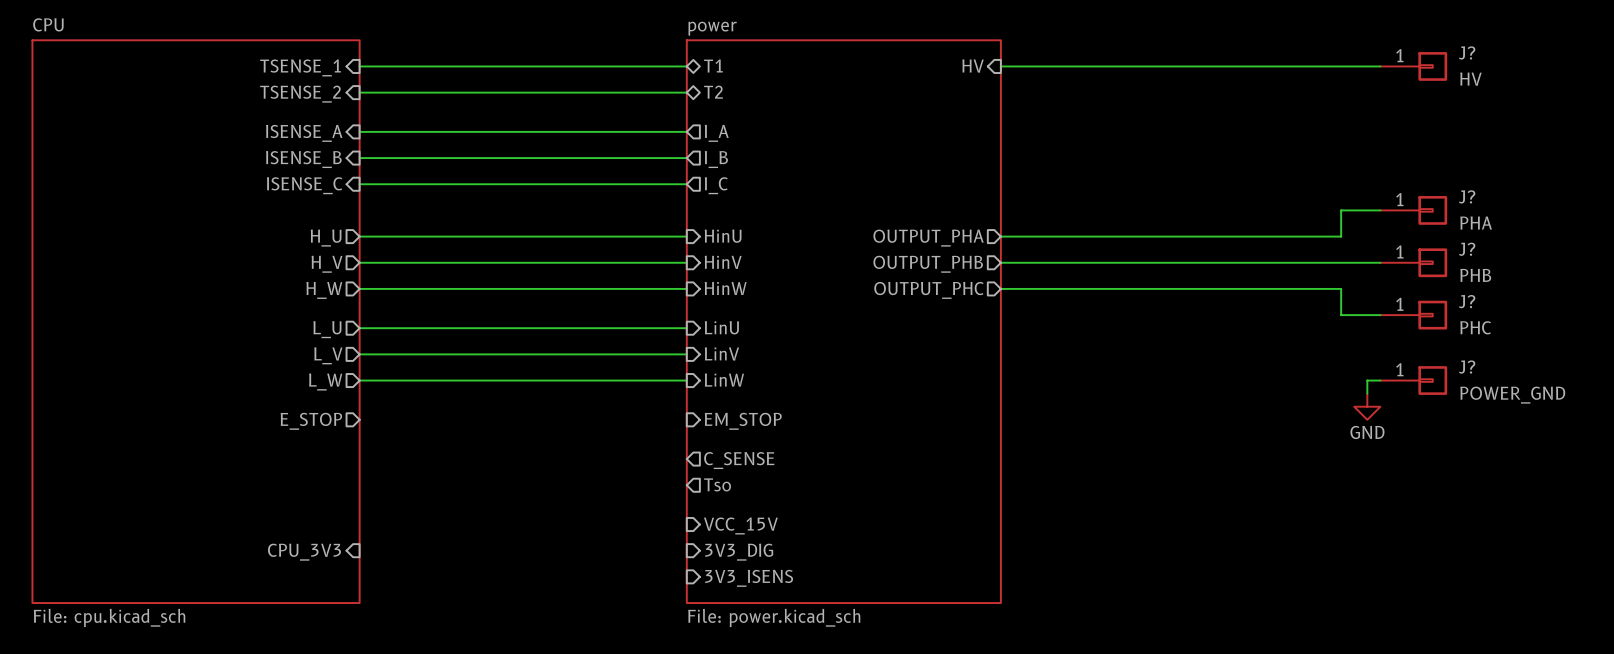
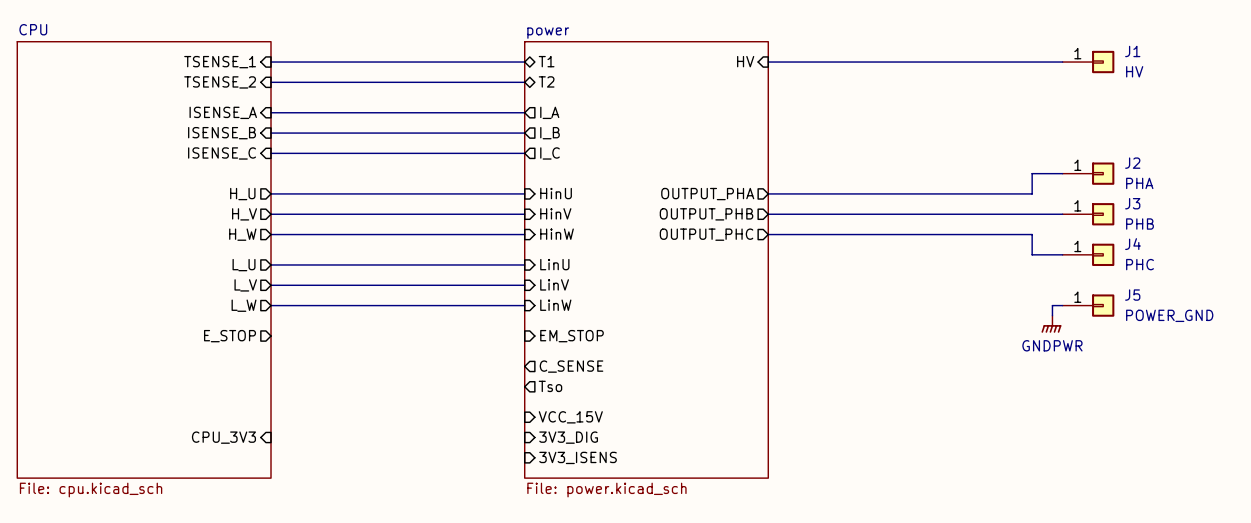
J? name: J? (1467, 52) -> J1 (1132, 51)
J? name: J? (1467, 196) -> J2 (1132, 163)
J? name: J? (1467, 249) -> J3 (1132, 203)
J? name: J? (1467, 301) -> J4 (1132, 244)
J? name: J? (1467, 367) -> J5 (1132, 295)
power symbol: GND (1367, 406) -> GNDPWR (1051, 324)

